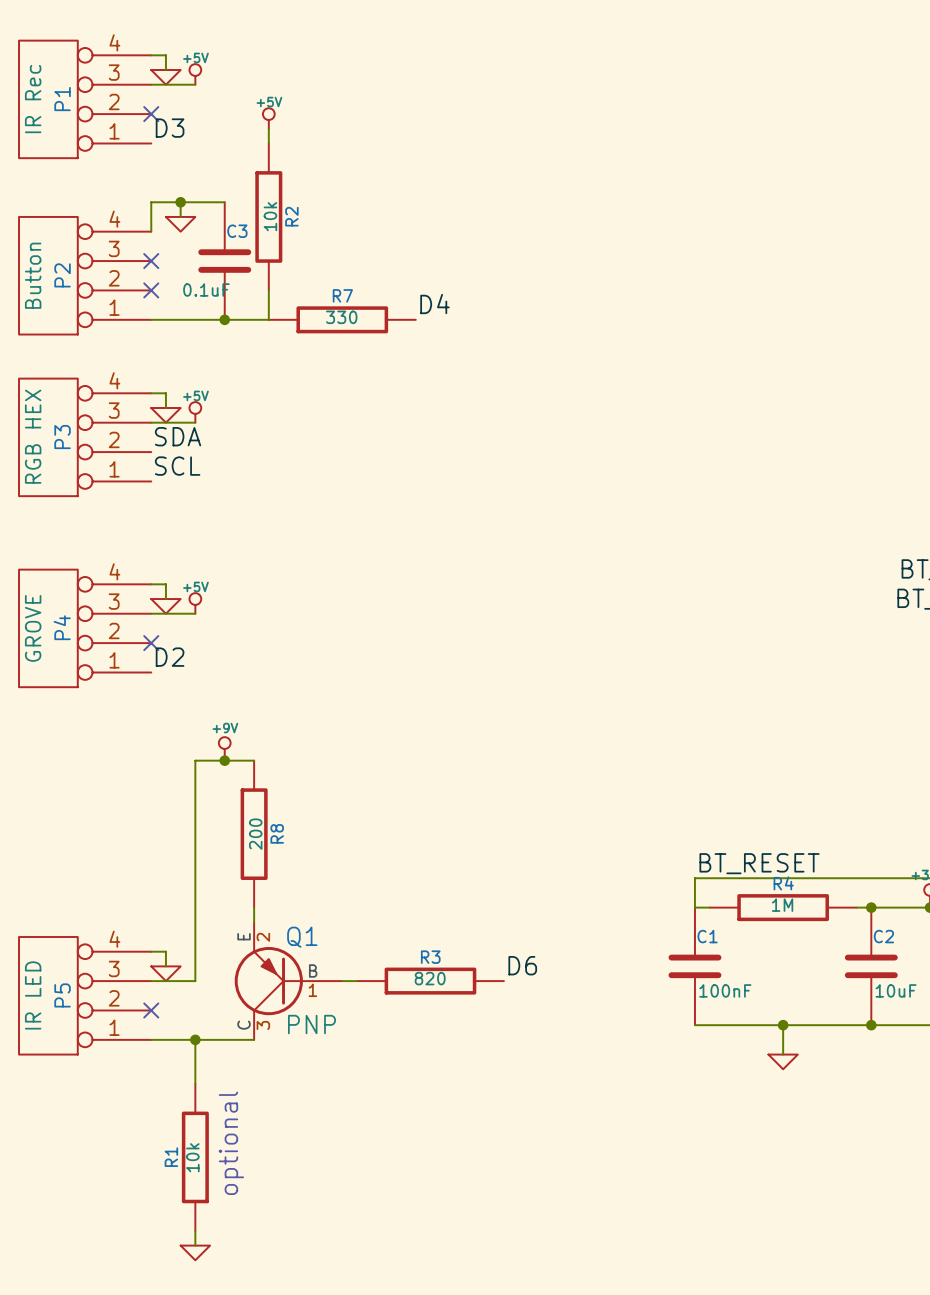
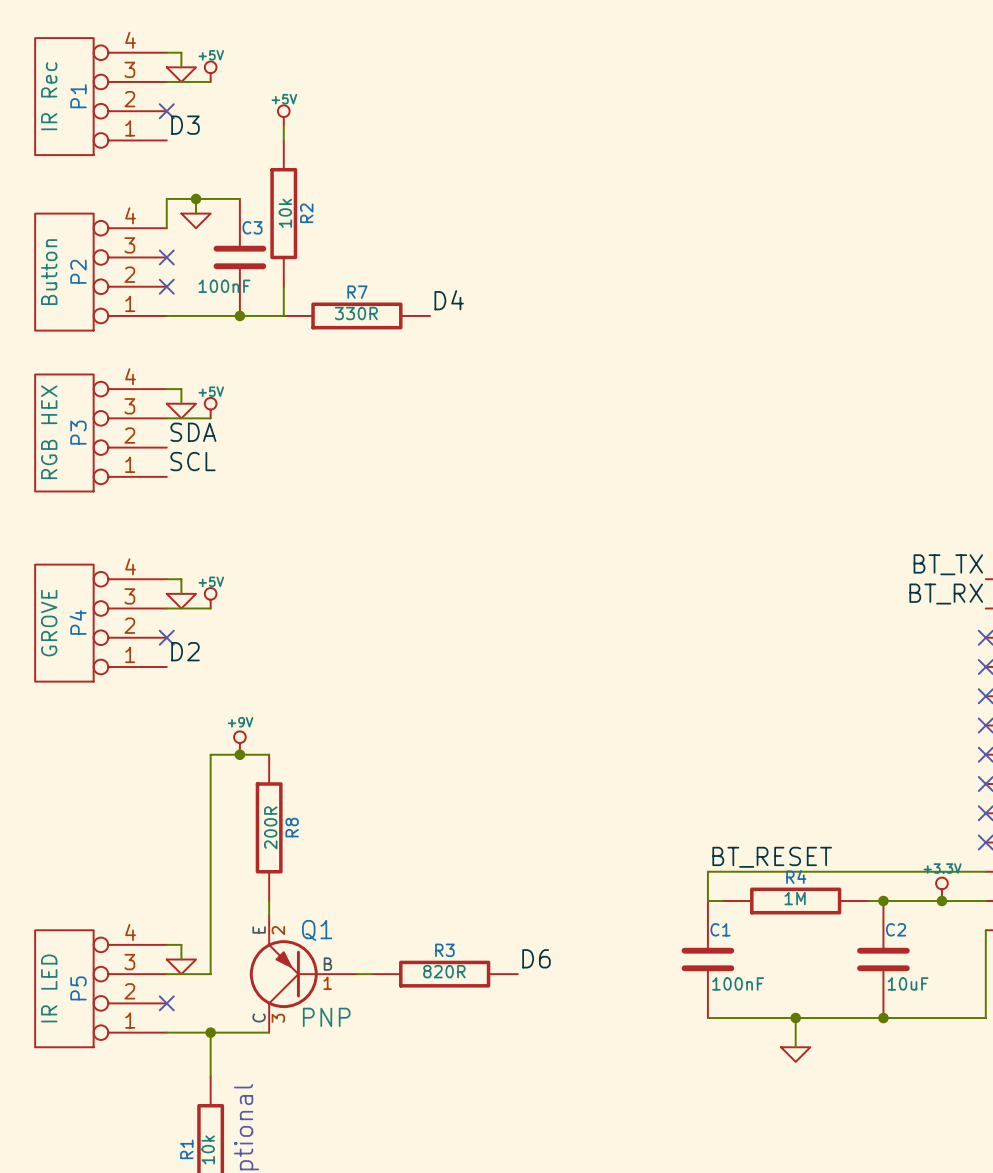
C3 value: 0.1uF (206, 289) -> 100nF (224, 286)
R7 value: 330 (341, 317) -> 330R (356, 313)
R8 value: 200 (255, 834) -> 200R (270, 827)
R3 value: 820 (430, 978) -> 820R (444, 971)

